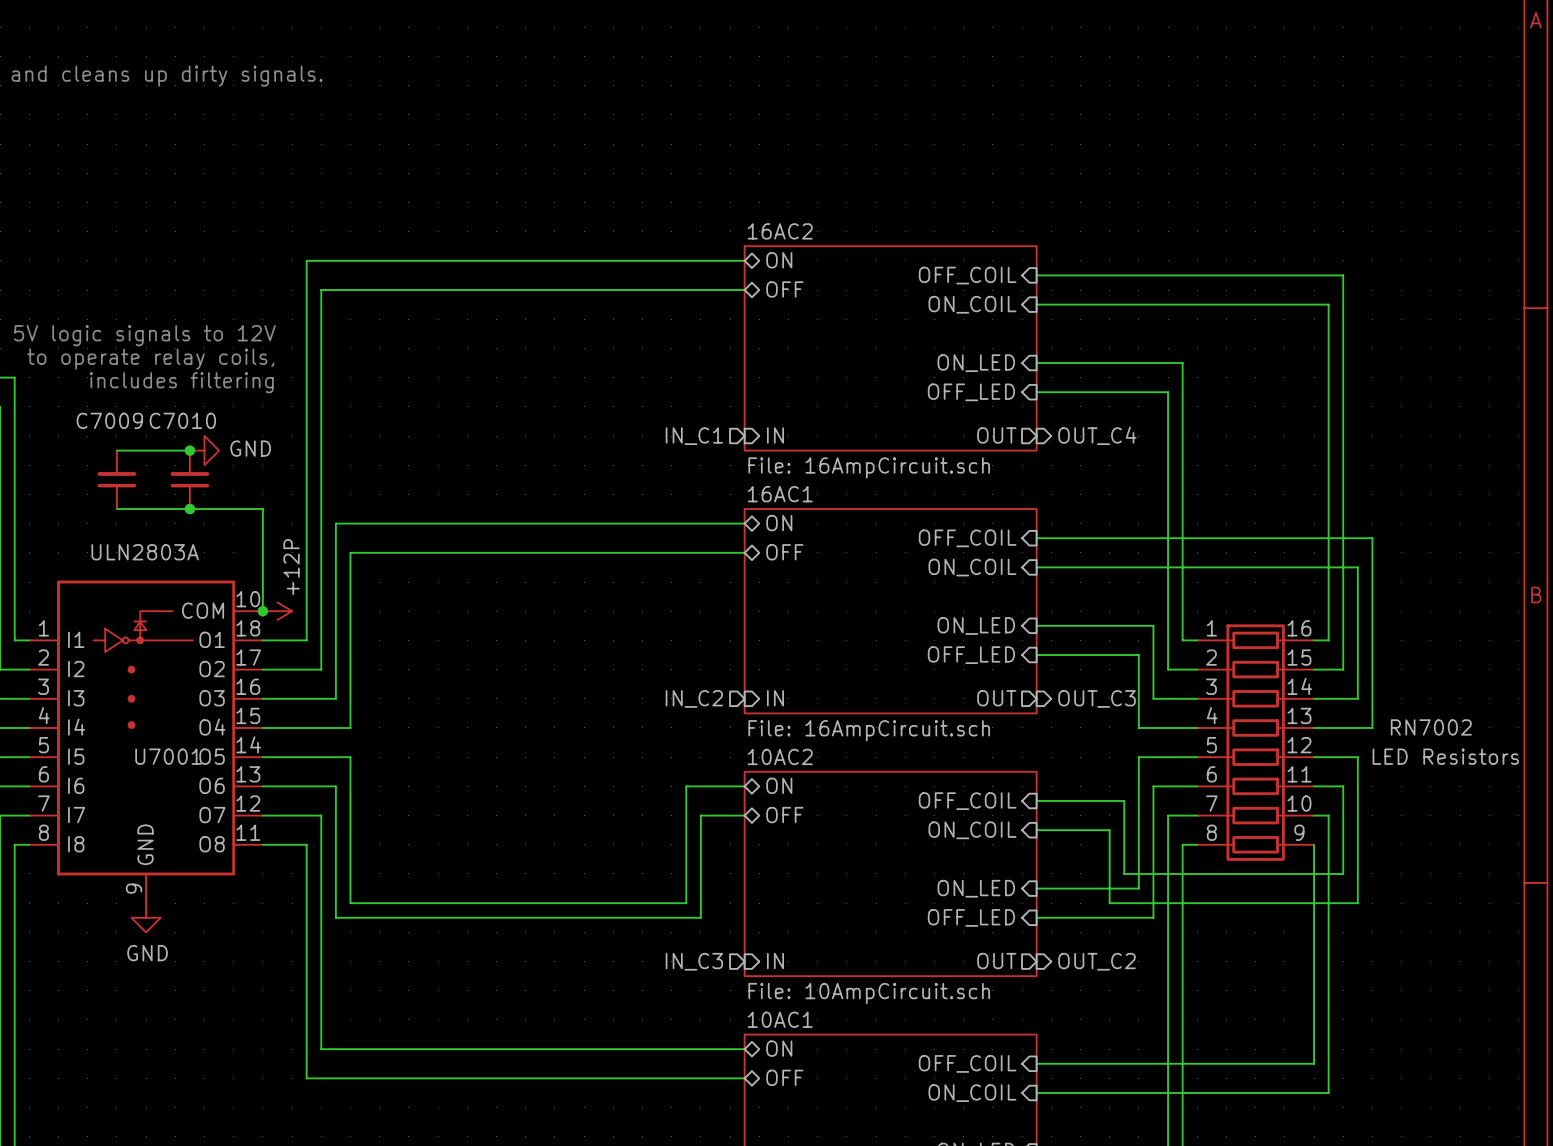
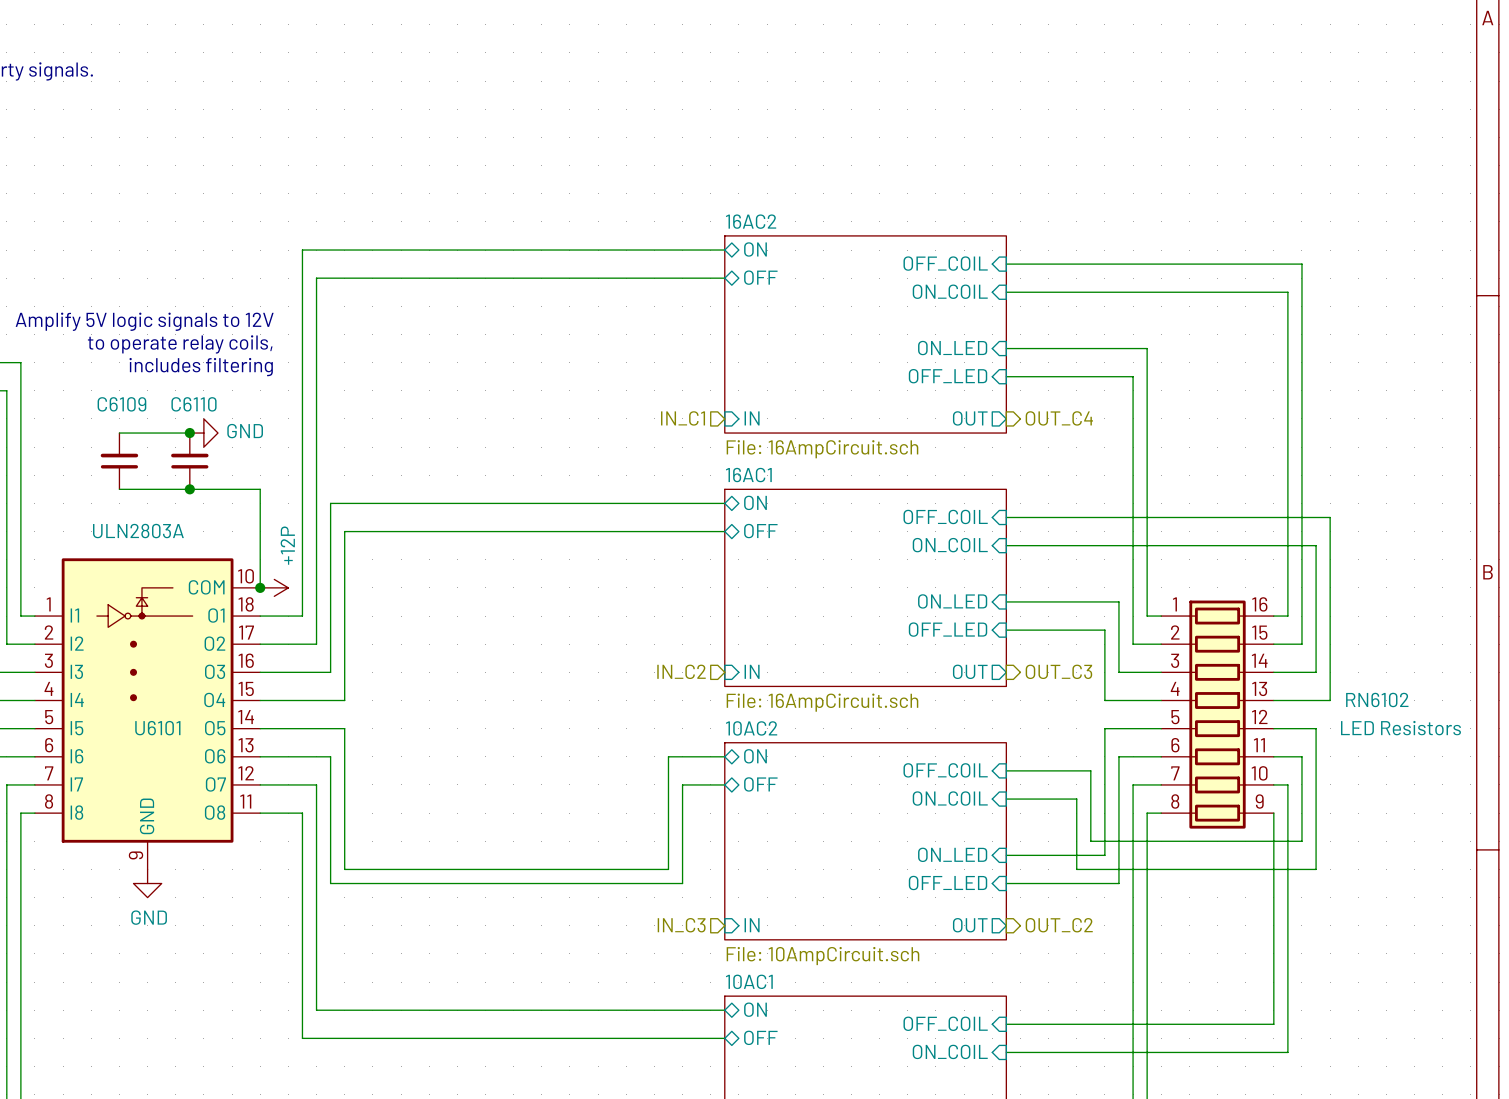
C7009 name: C7009 (109, 420) -> C6109 (121, 404)
C7010 name: C7010 (182, 420) -> C6110 (193, 404)
RN7002 name: RN7002 (1431, 727) -> RN6102 (1377, 699)
U7001 name: U7001 (168, 756) -> U6101 (157, 728)

